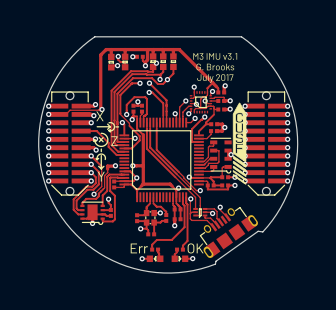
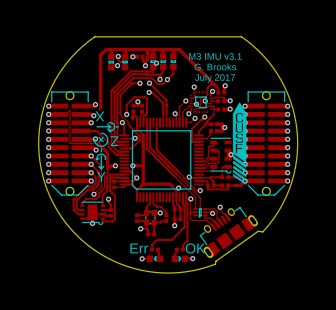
track: (102, 109) (70, 110) (65, 114) -> (99, 143) (70, 143) (69, 110) (65, 114)
via: (102, 109) -> none
via: (132, 119) -> none
track: none -> (98, 143) (107, 152) (107, 166)
track: none -> (234, 177) (241, 177) (245, 181) (240, 185) (234, 185)
via: (234, 177) -> none
via: (234, 185) -> none

